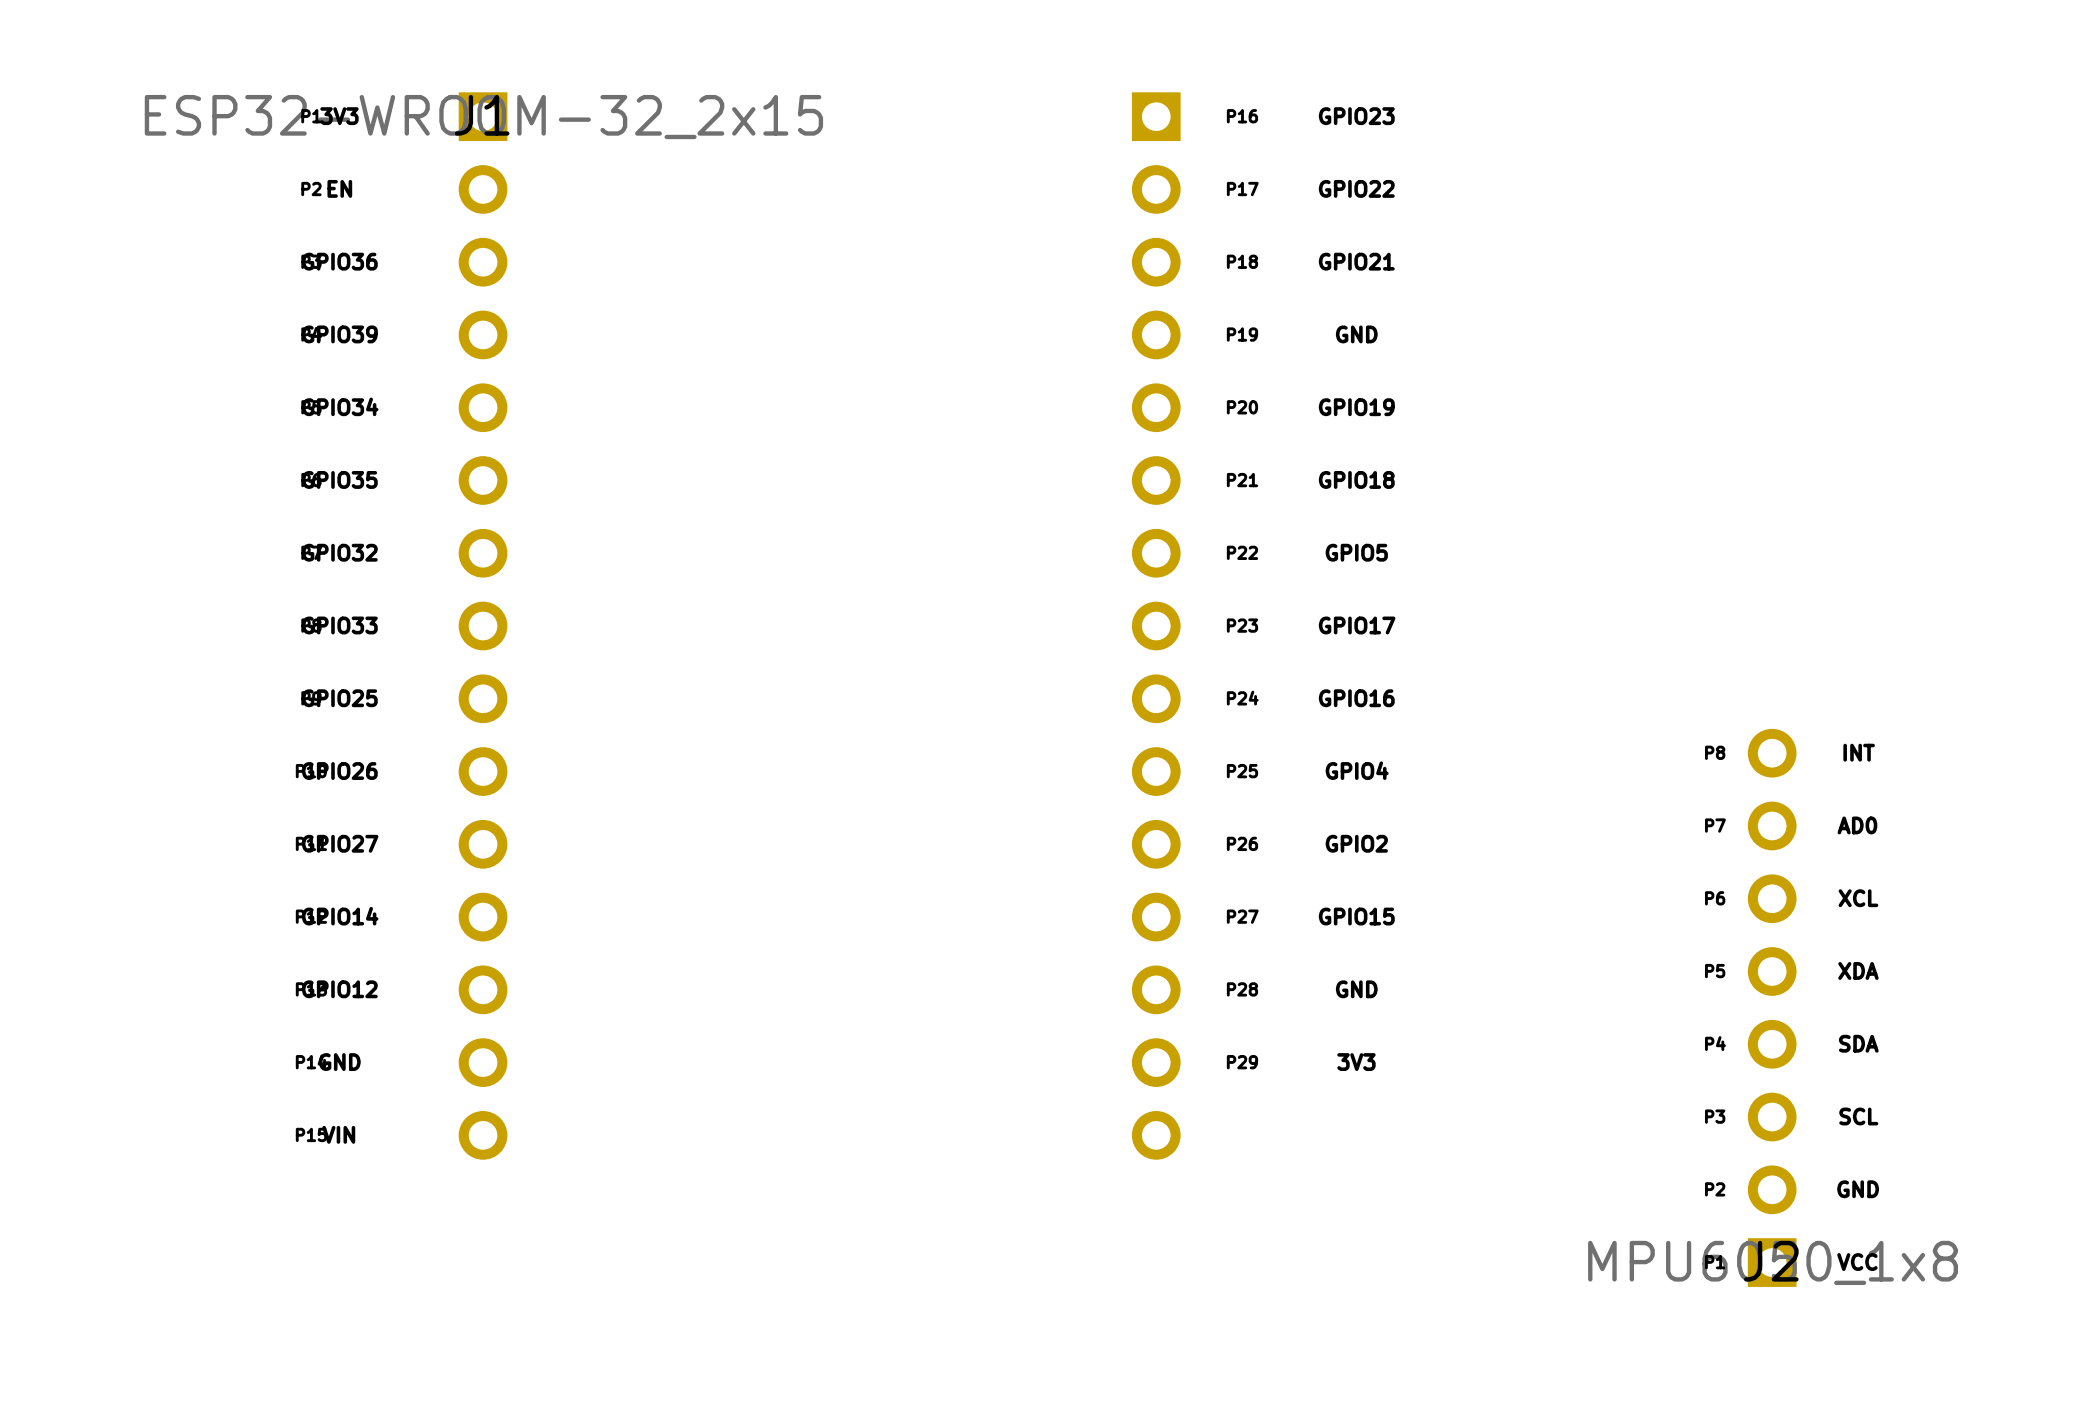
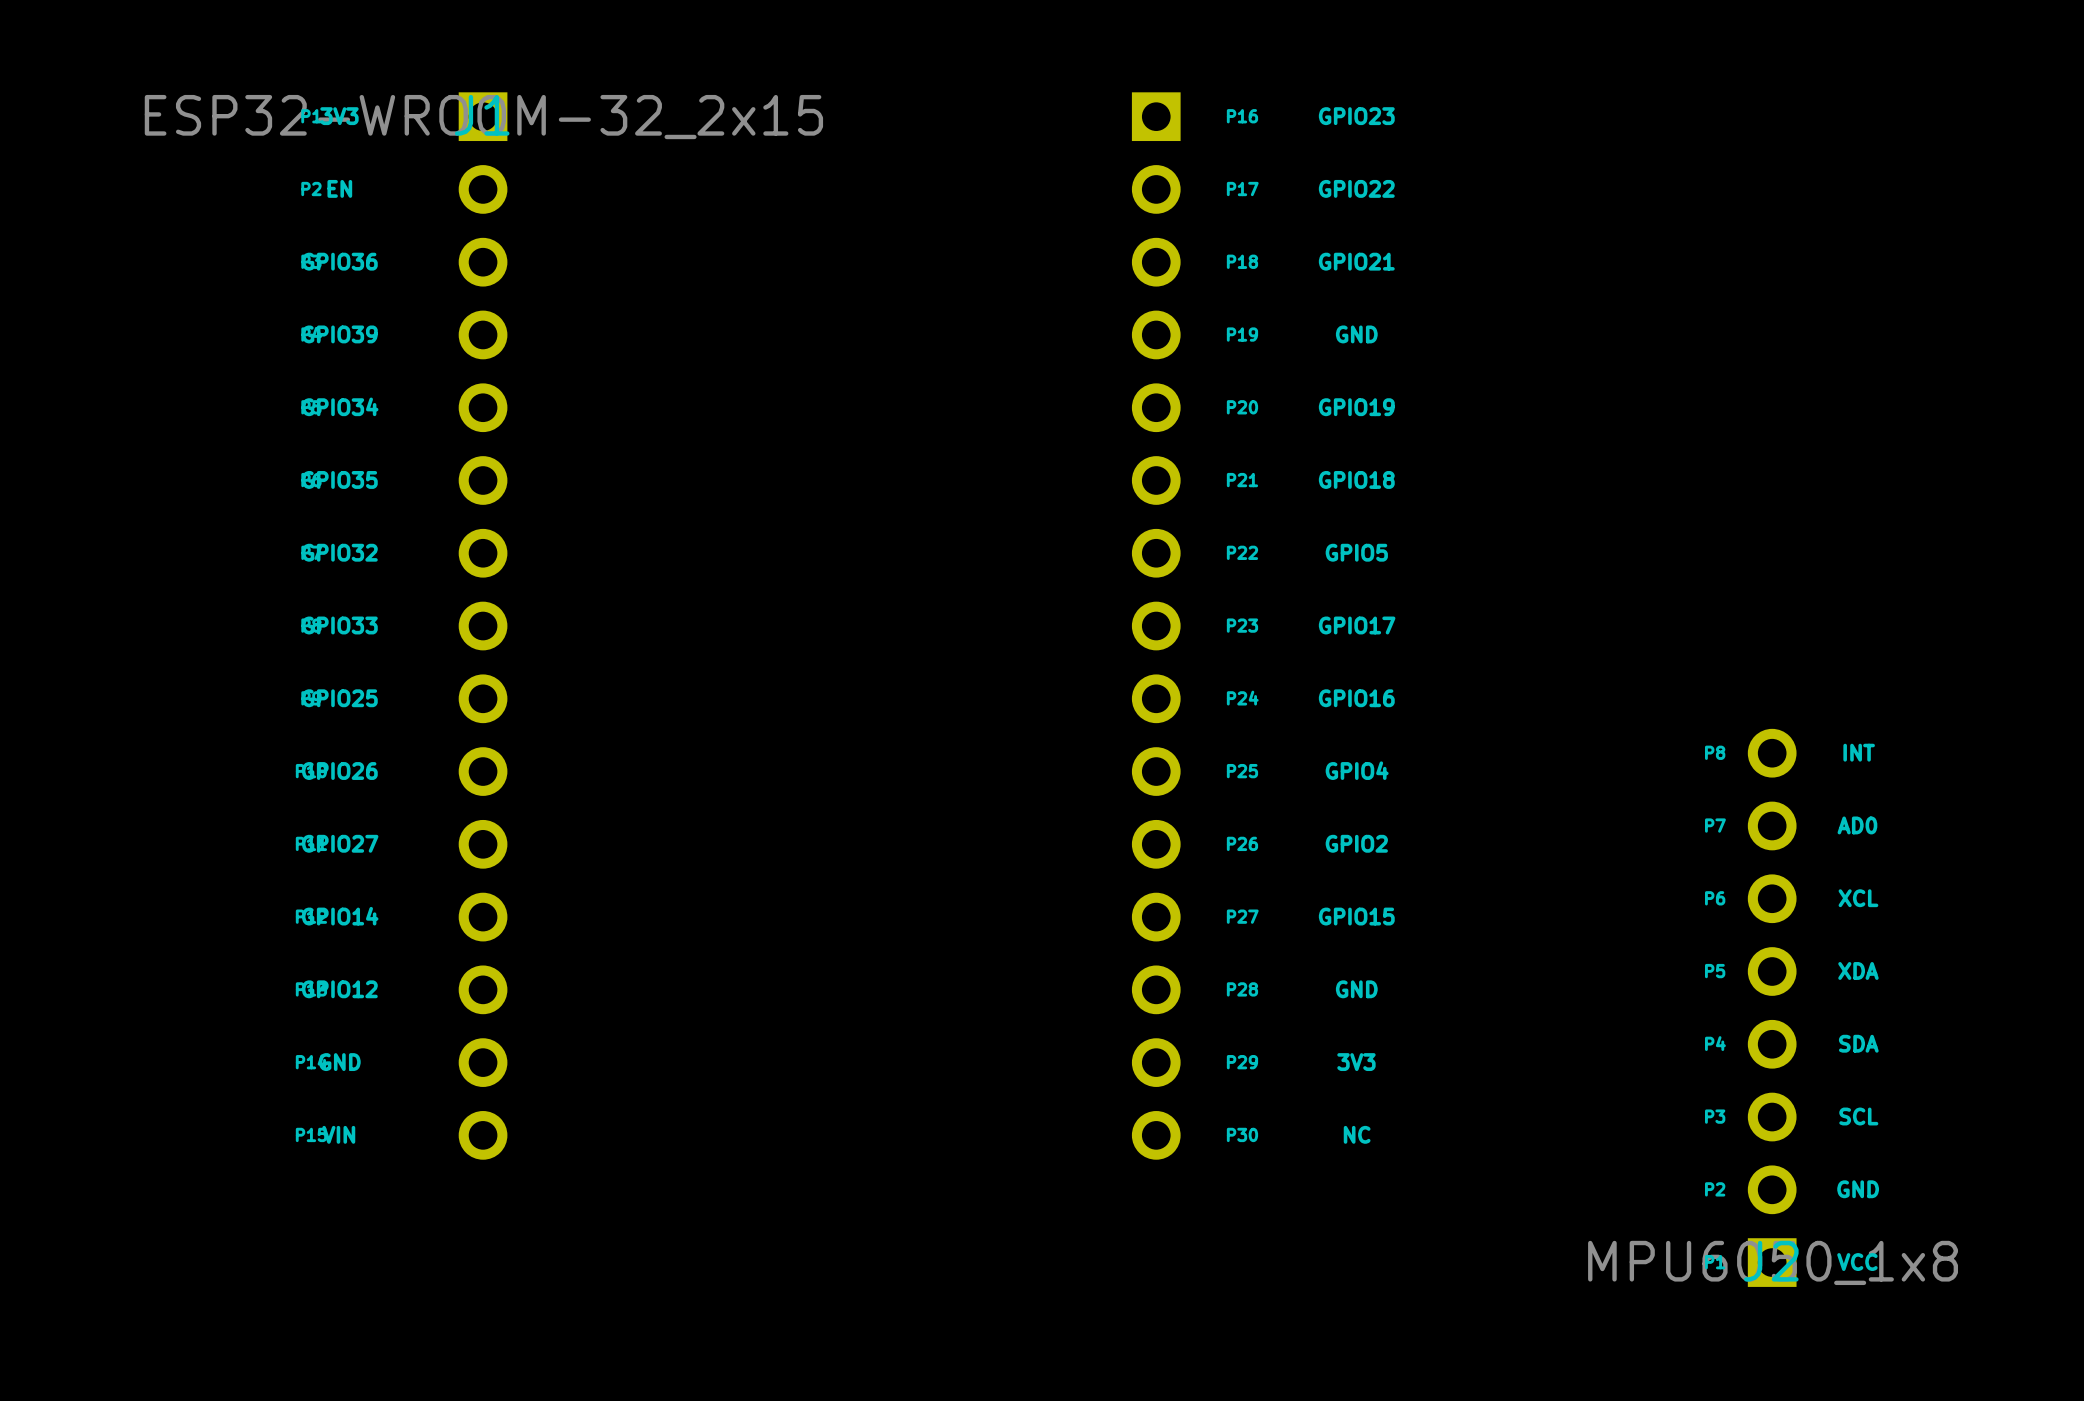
text: none -> P30 (1242, 1134)
text: none -> NC (1357, 1134)

